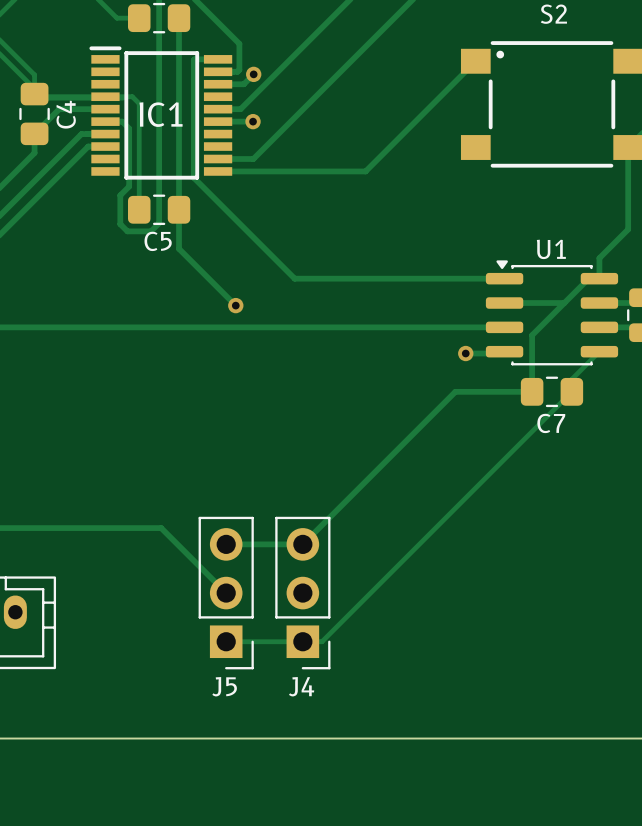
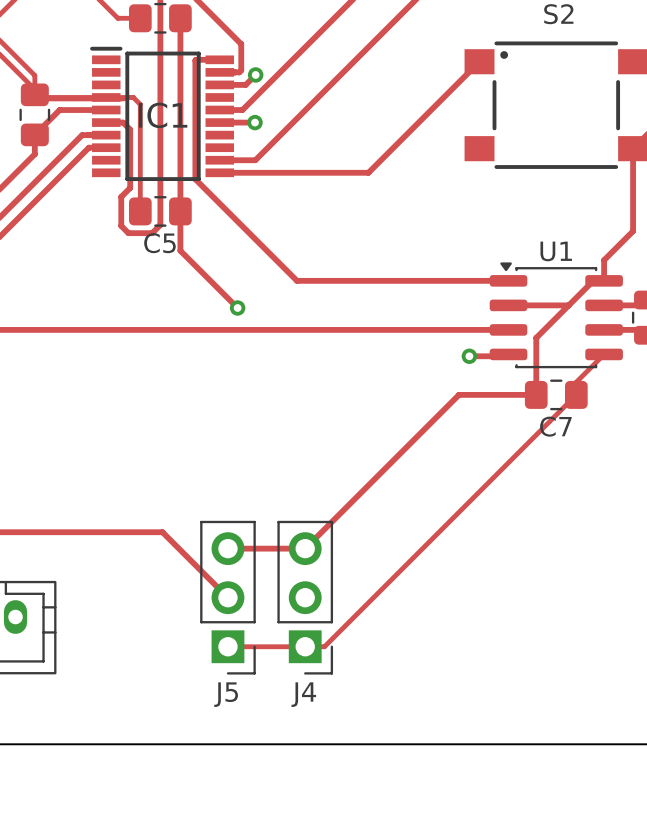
C4 name: C4 (66, 114) -> none

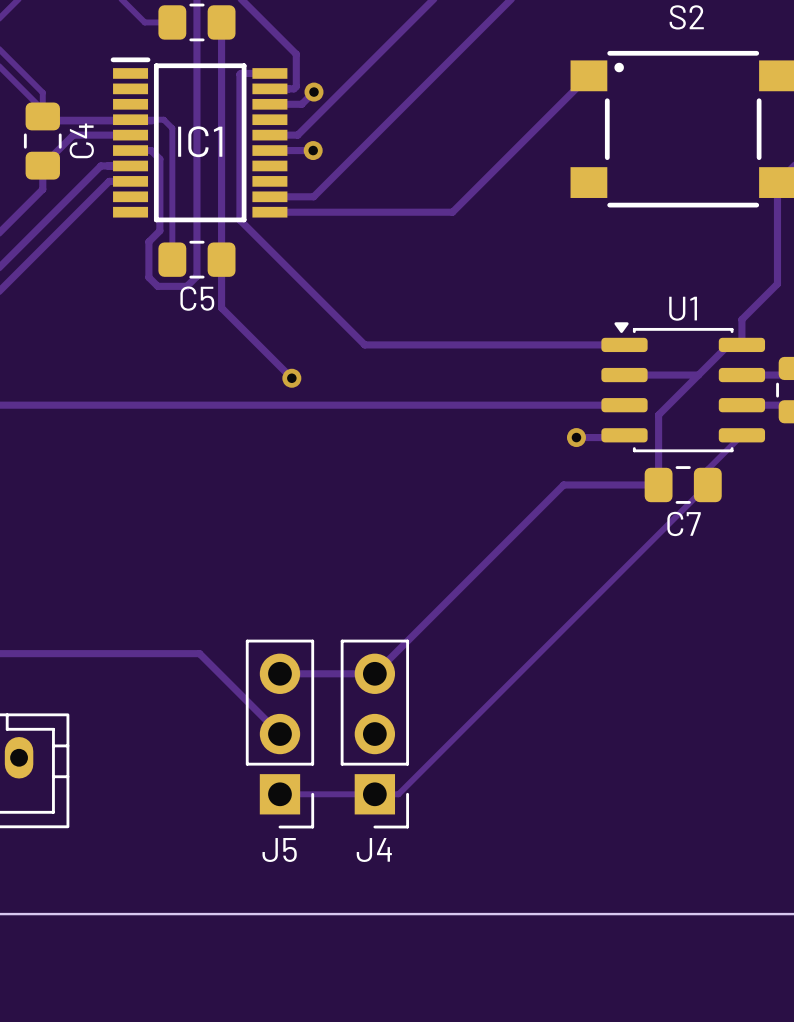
C4 name: none -> C4 (81, 140)

